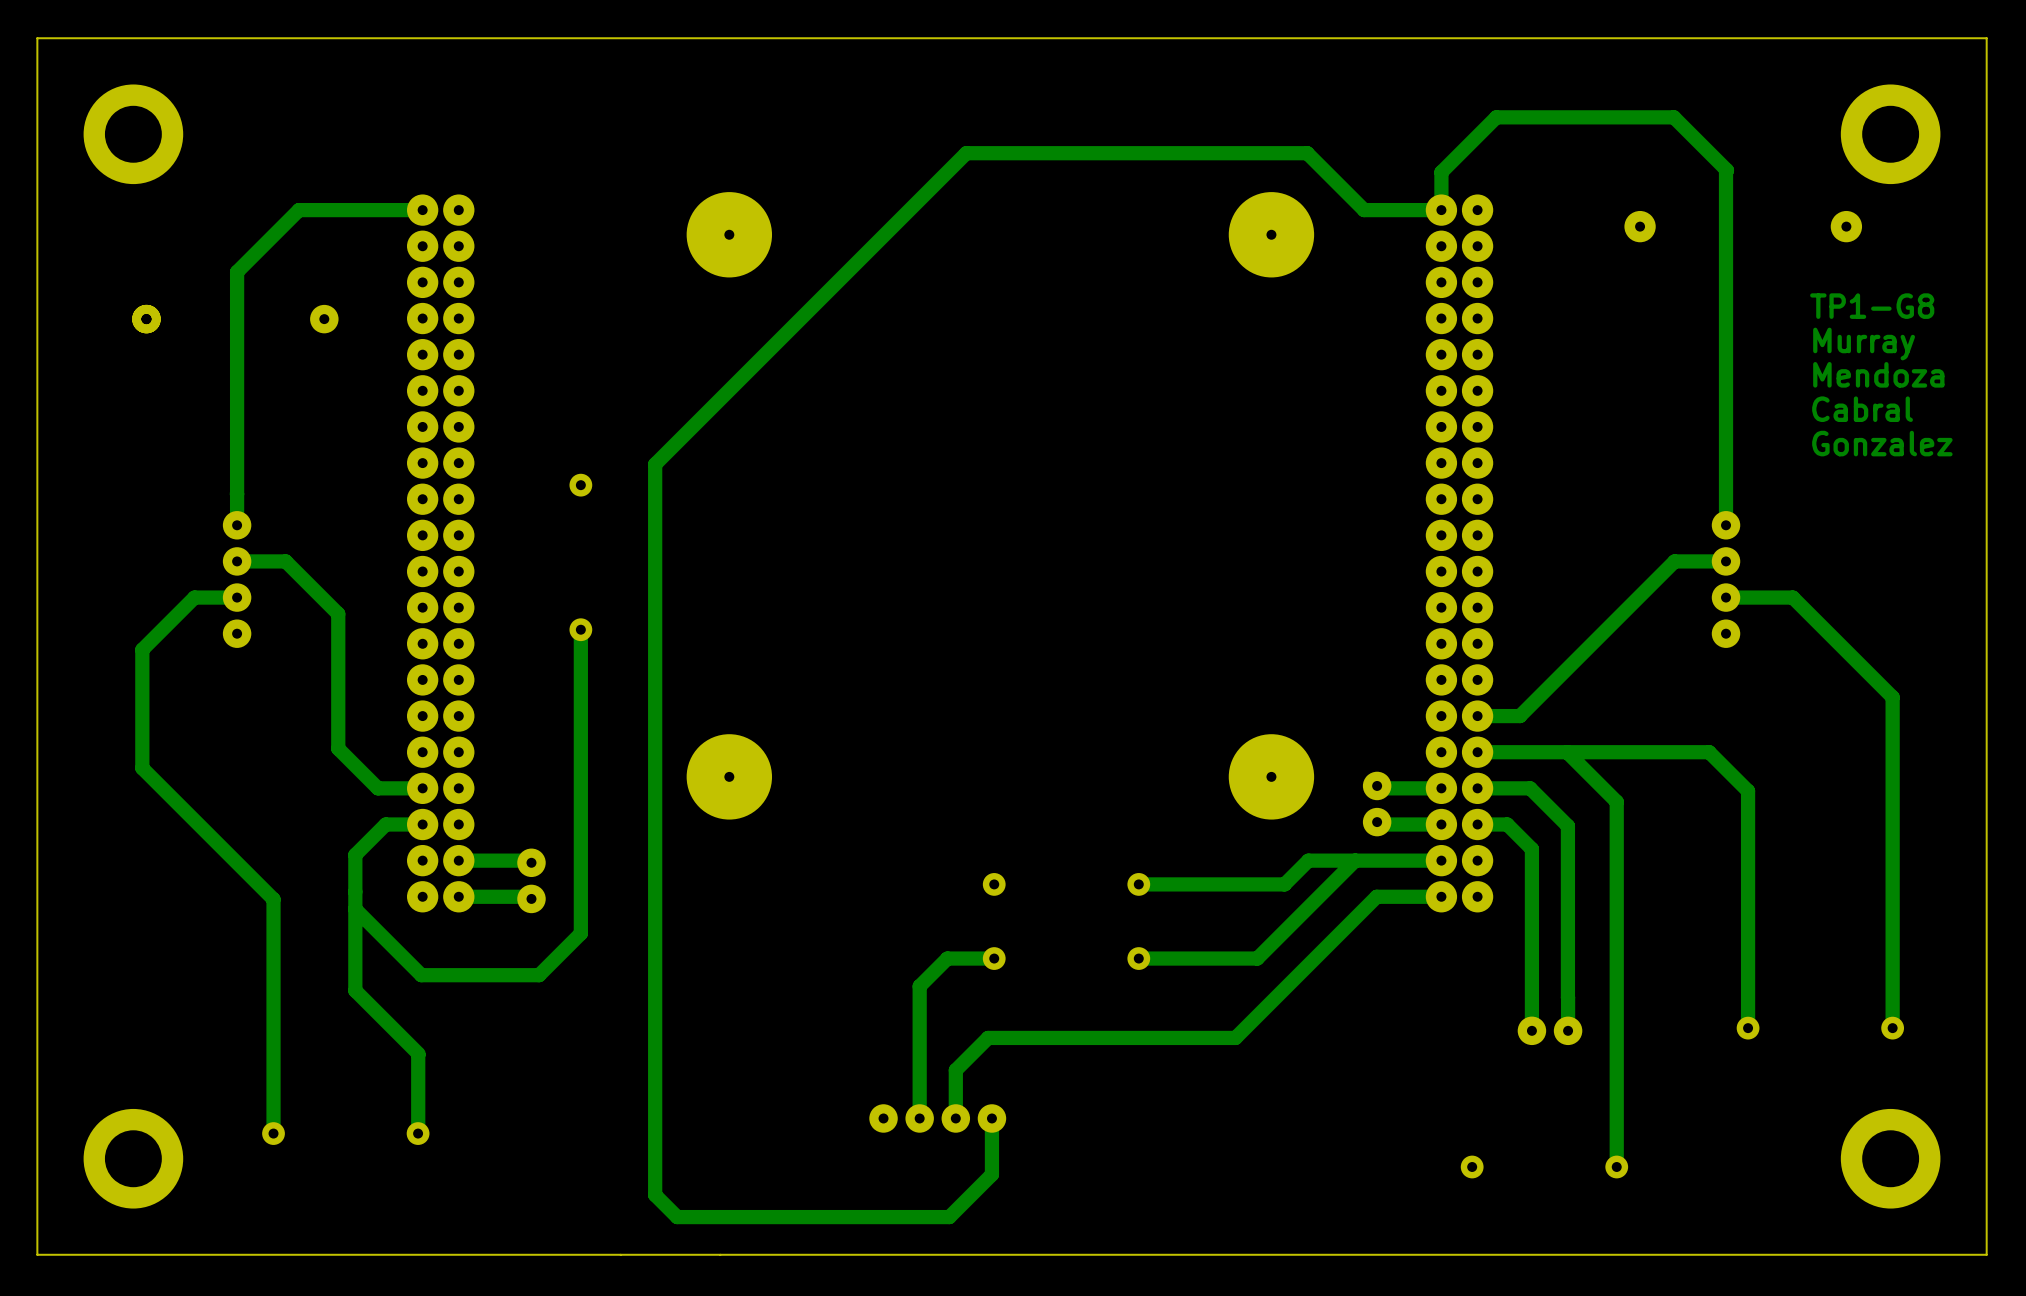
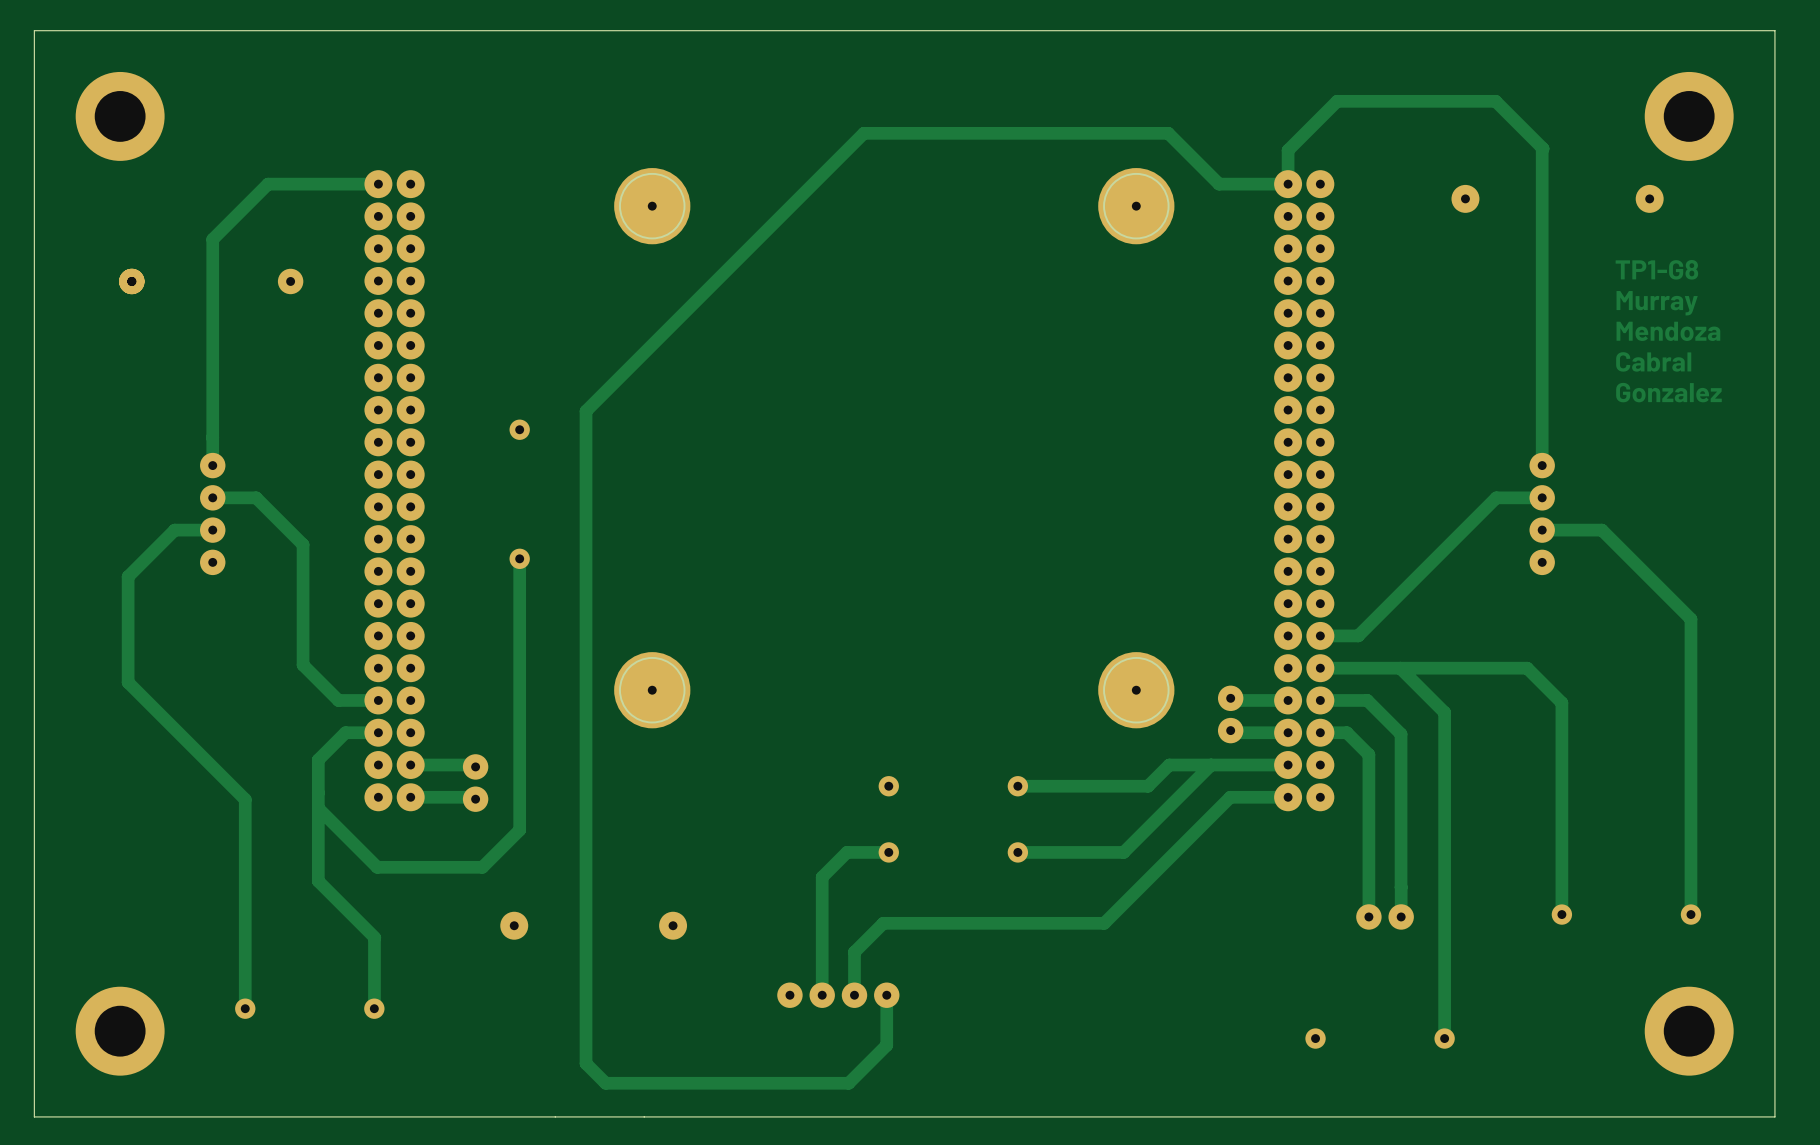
part: none -> (514, 925)
part: none -> (673, 925)

